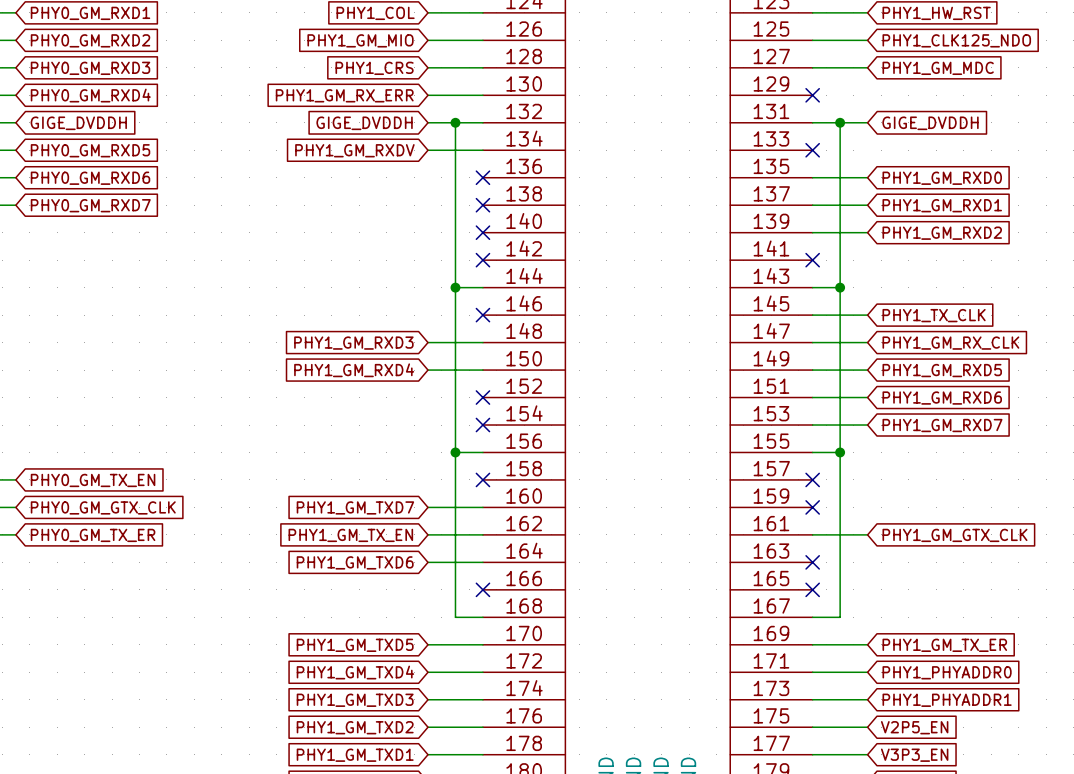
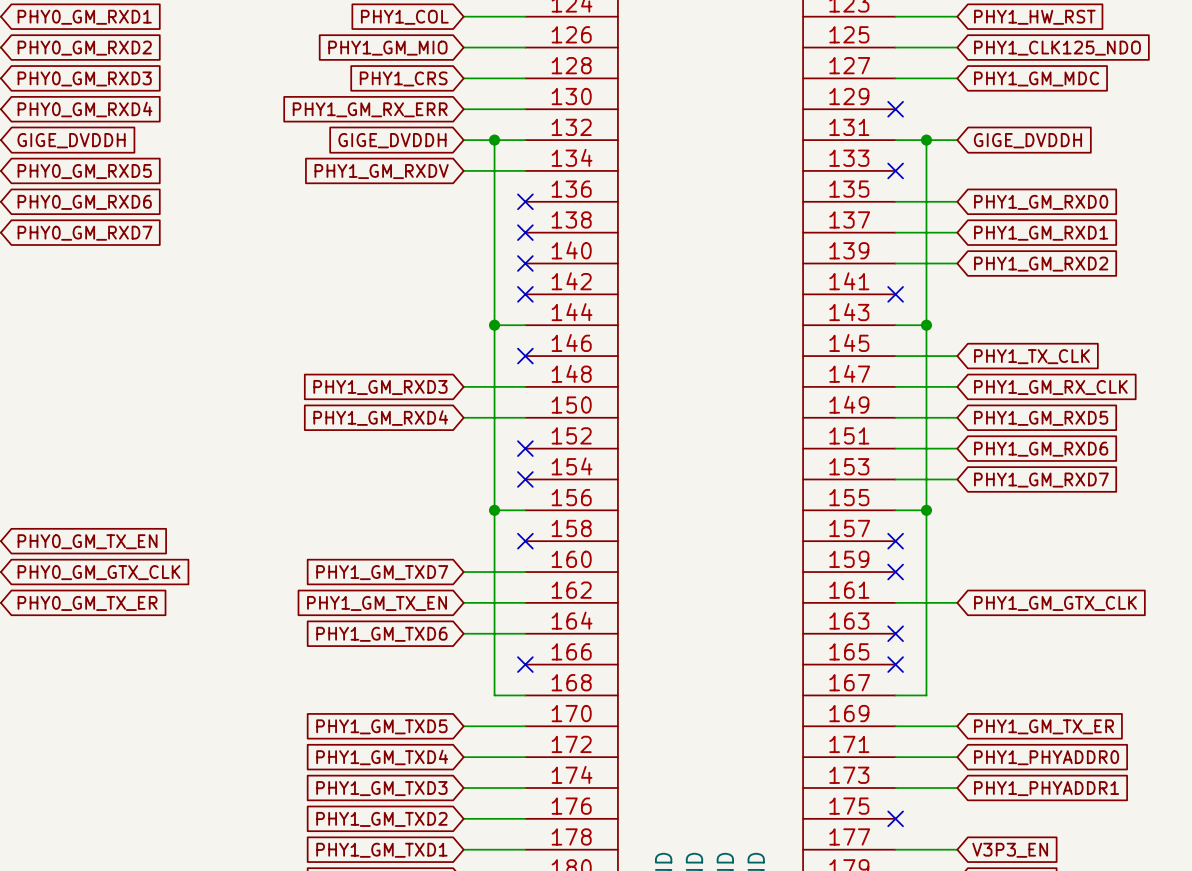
wire: (812, 727) (867, 727) -> none
no-connect mark: none -> (895, 818)
global label: V2P5_EN (914, 727) -> none

